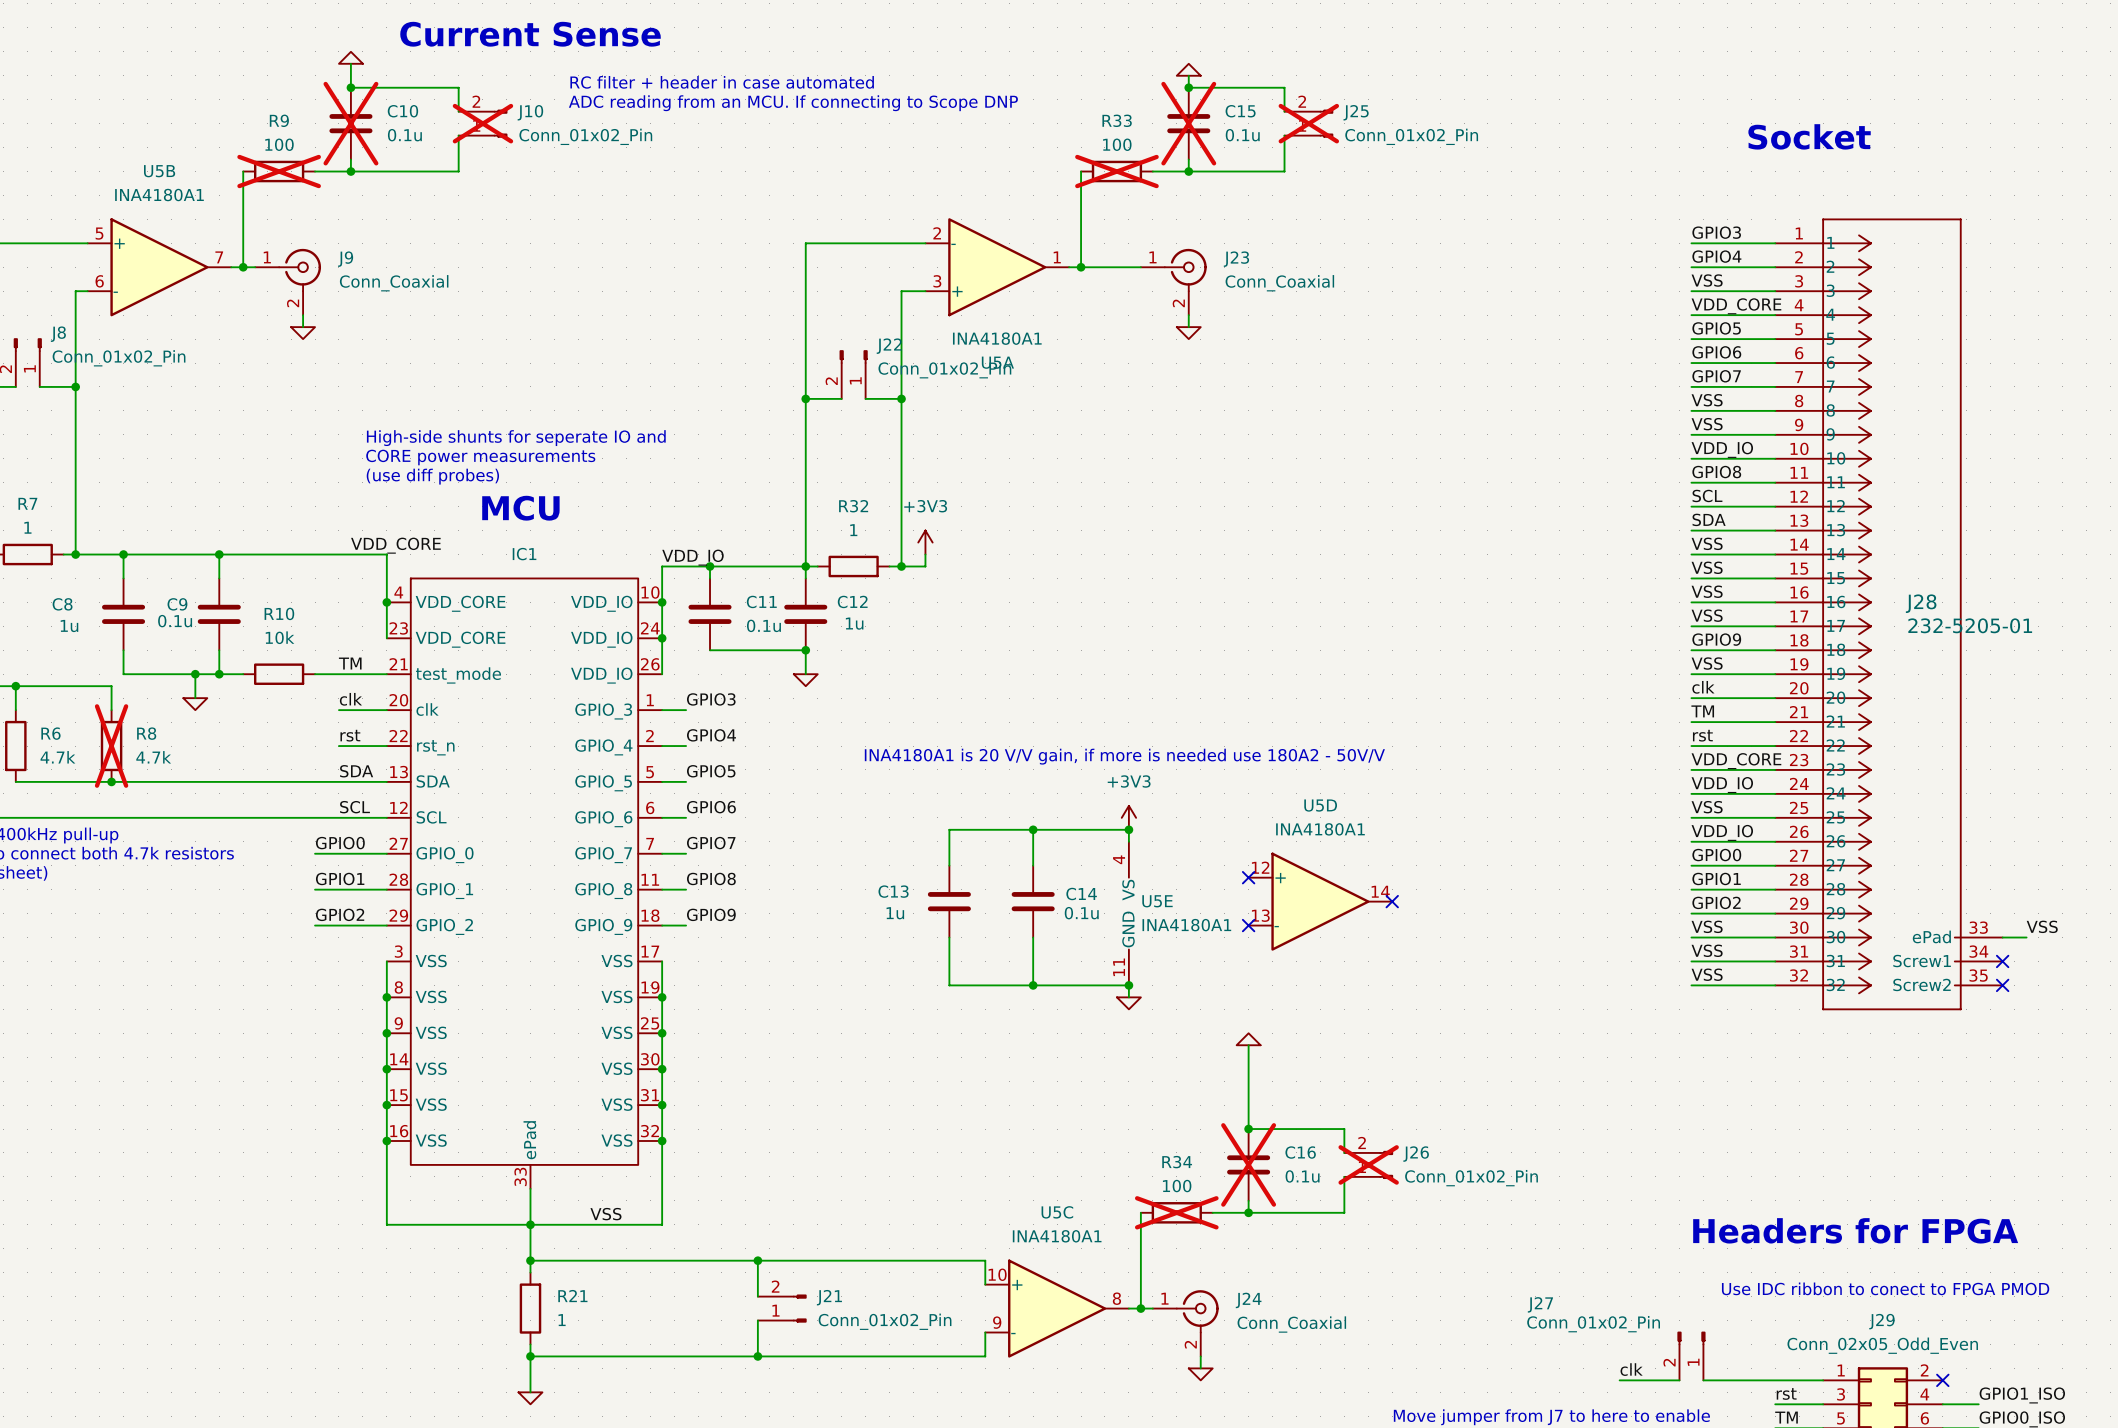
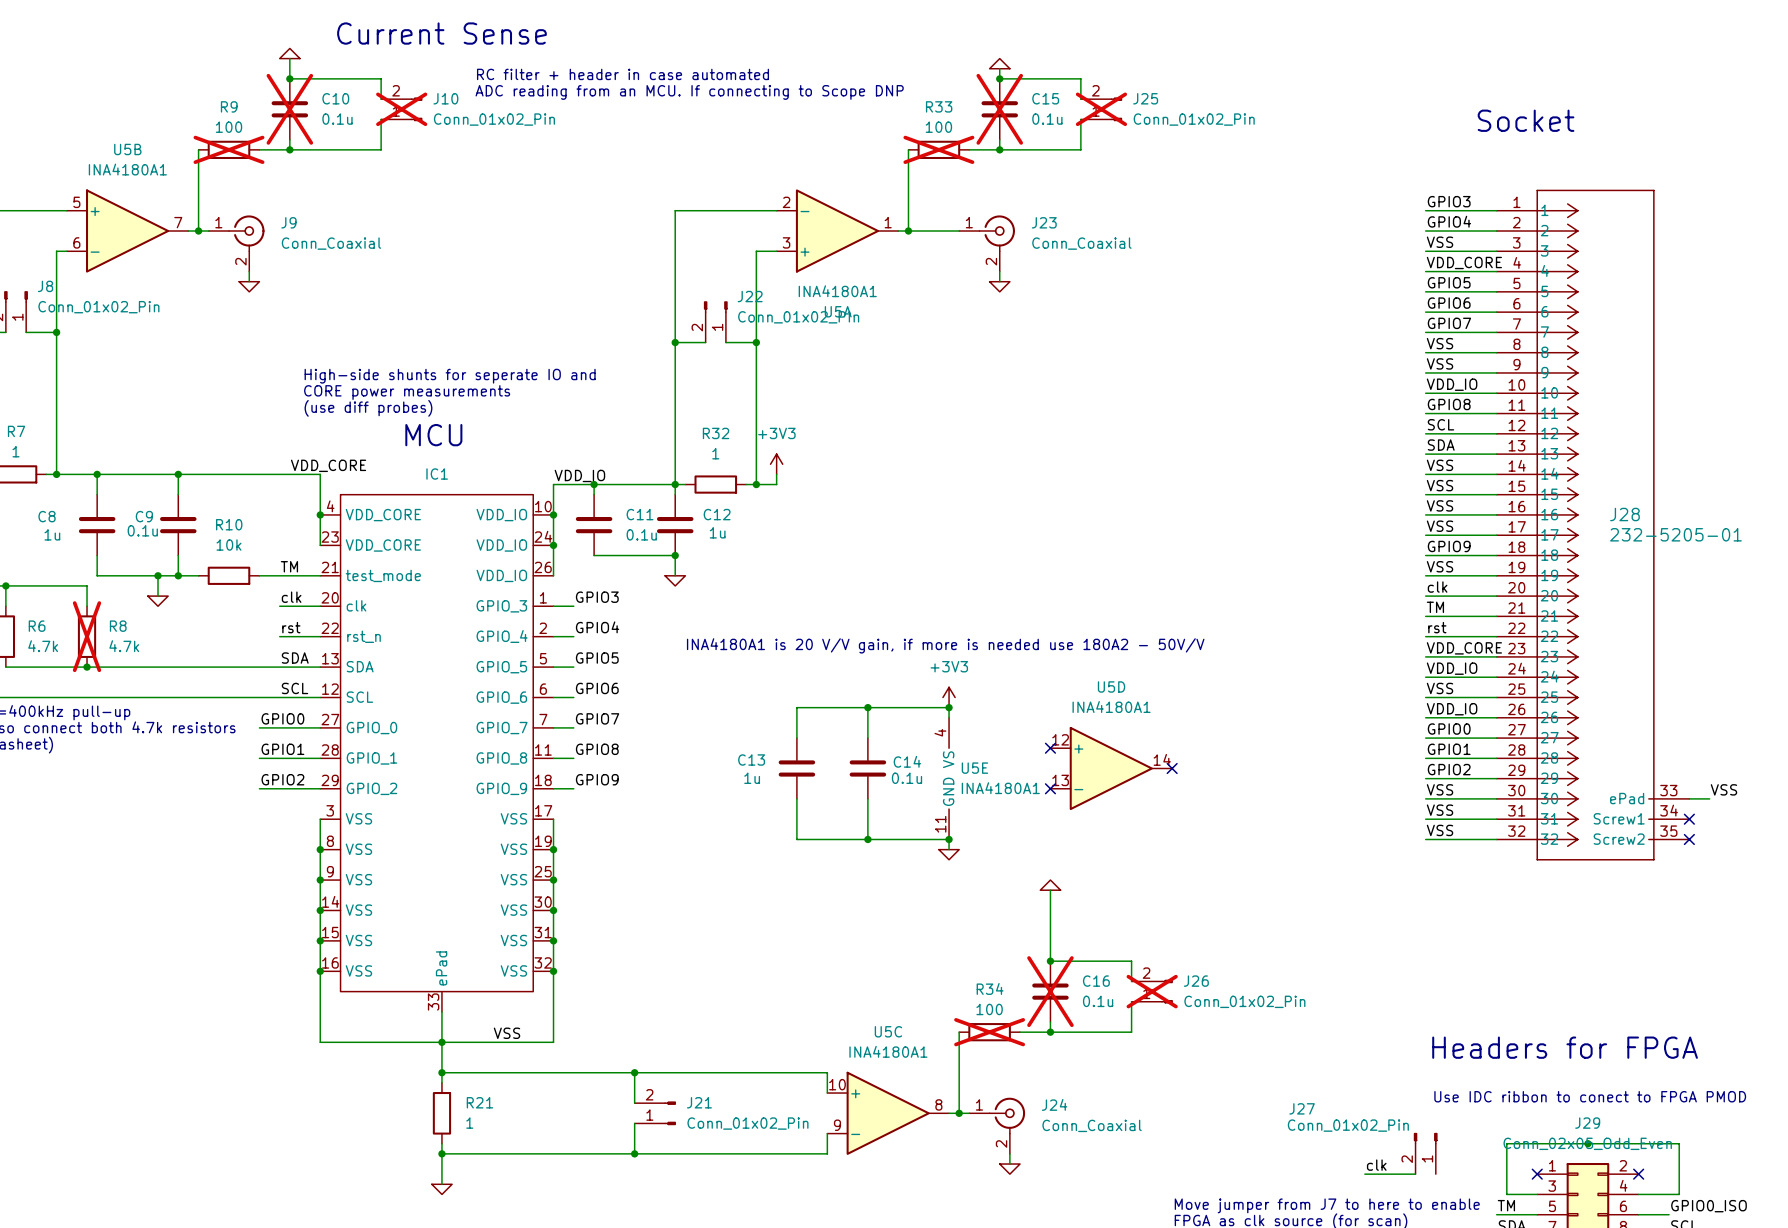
junction: none -> (1587, 1143)
wire: (1703, 1380) (1823, 1380) -> none
no-connect mark: none -> (1537, 1174)
label: rst (1786, 1393) -> none
label: GPIO1_ISO (2022, 1395) -> none
wire: (1775, 1404) (1787, 1404) -> (1669, 1194) (1679, 1194) (1679, 1143) (1506, 1143) (1506, 1194)

